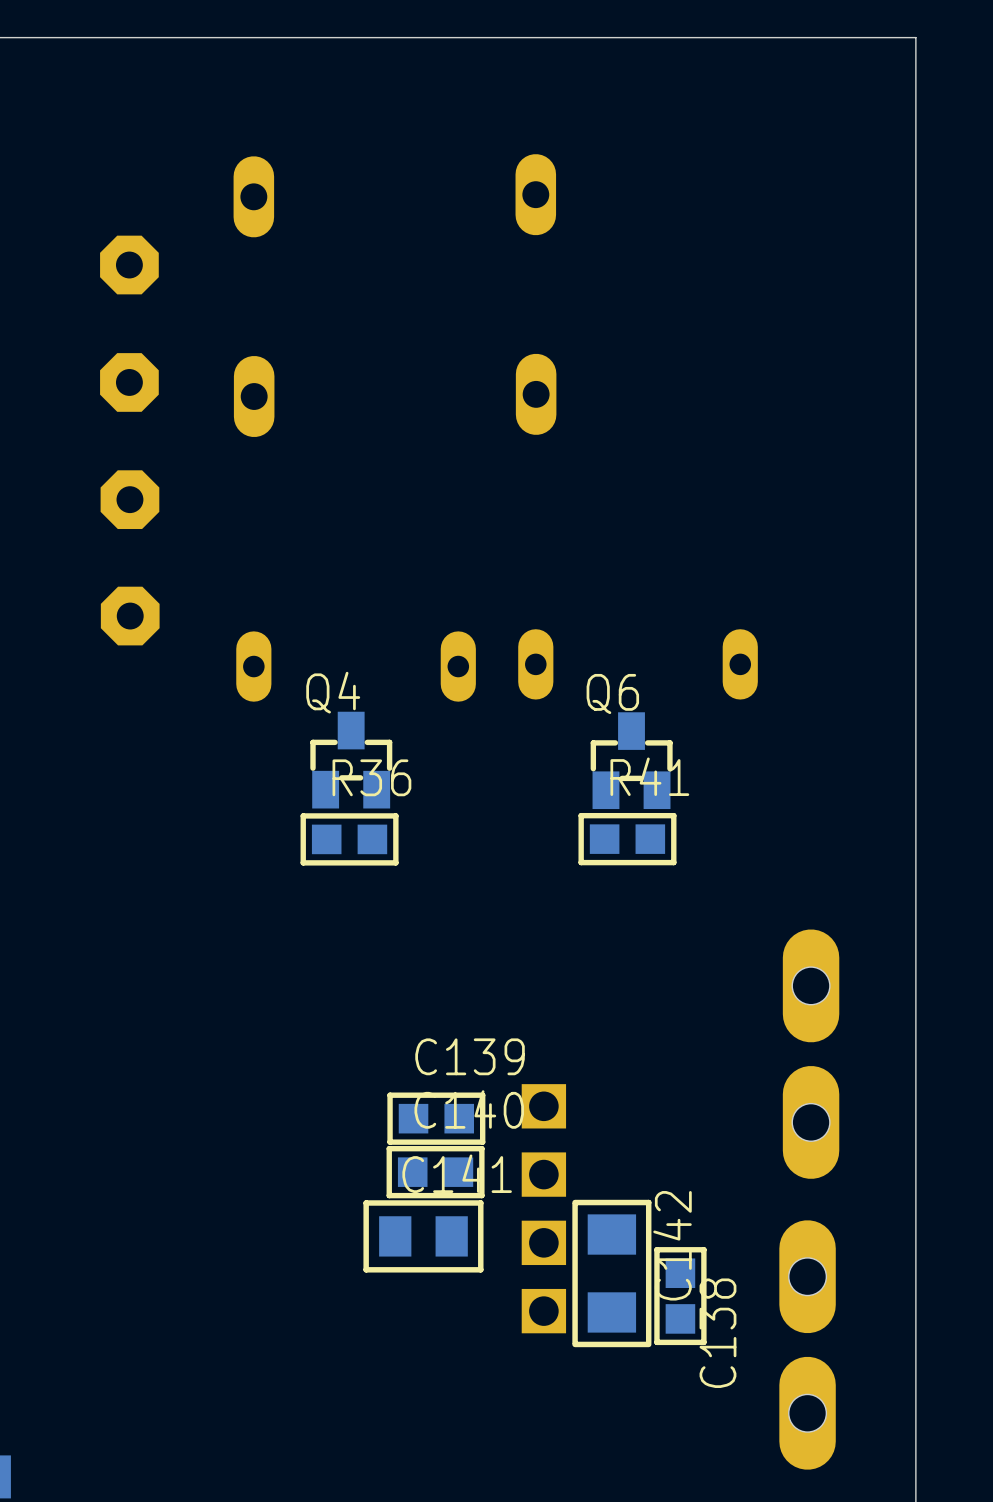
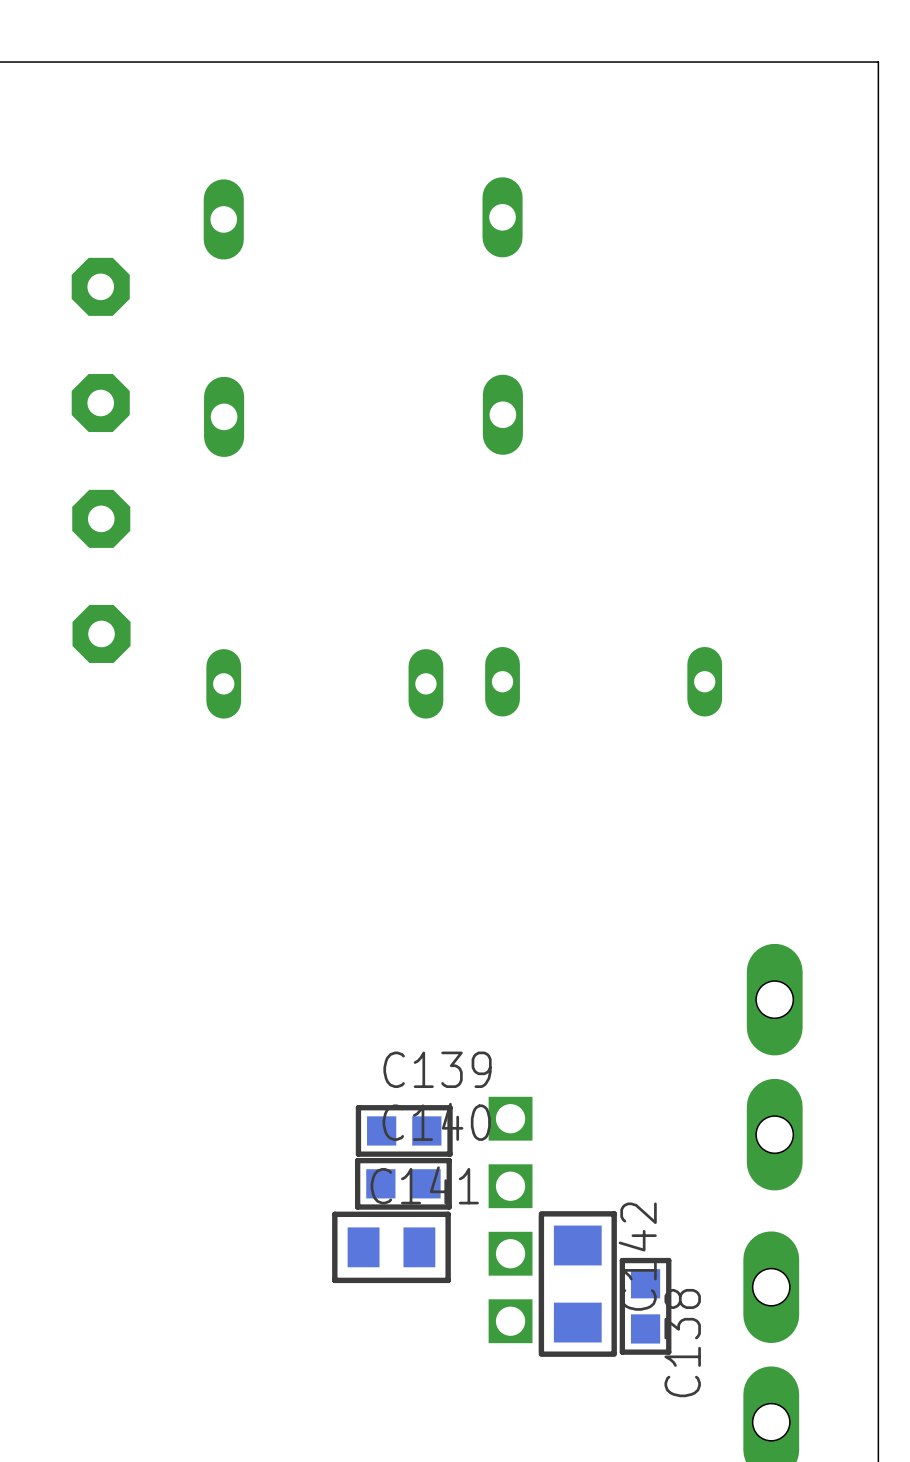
Q4: (351, 760) -> none
Q6: (631, 760) -> none
R36: (349, 839) -> none
R41: (627, 839) -> none

